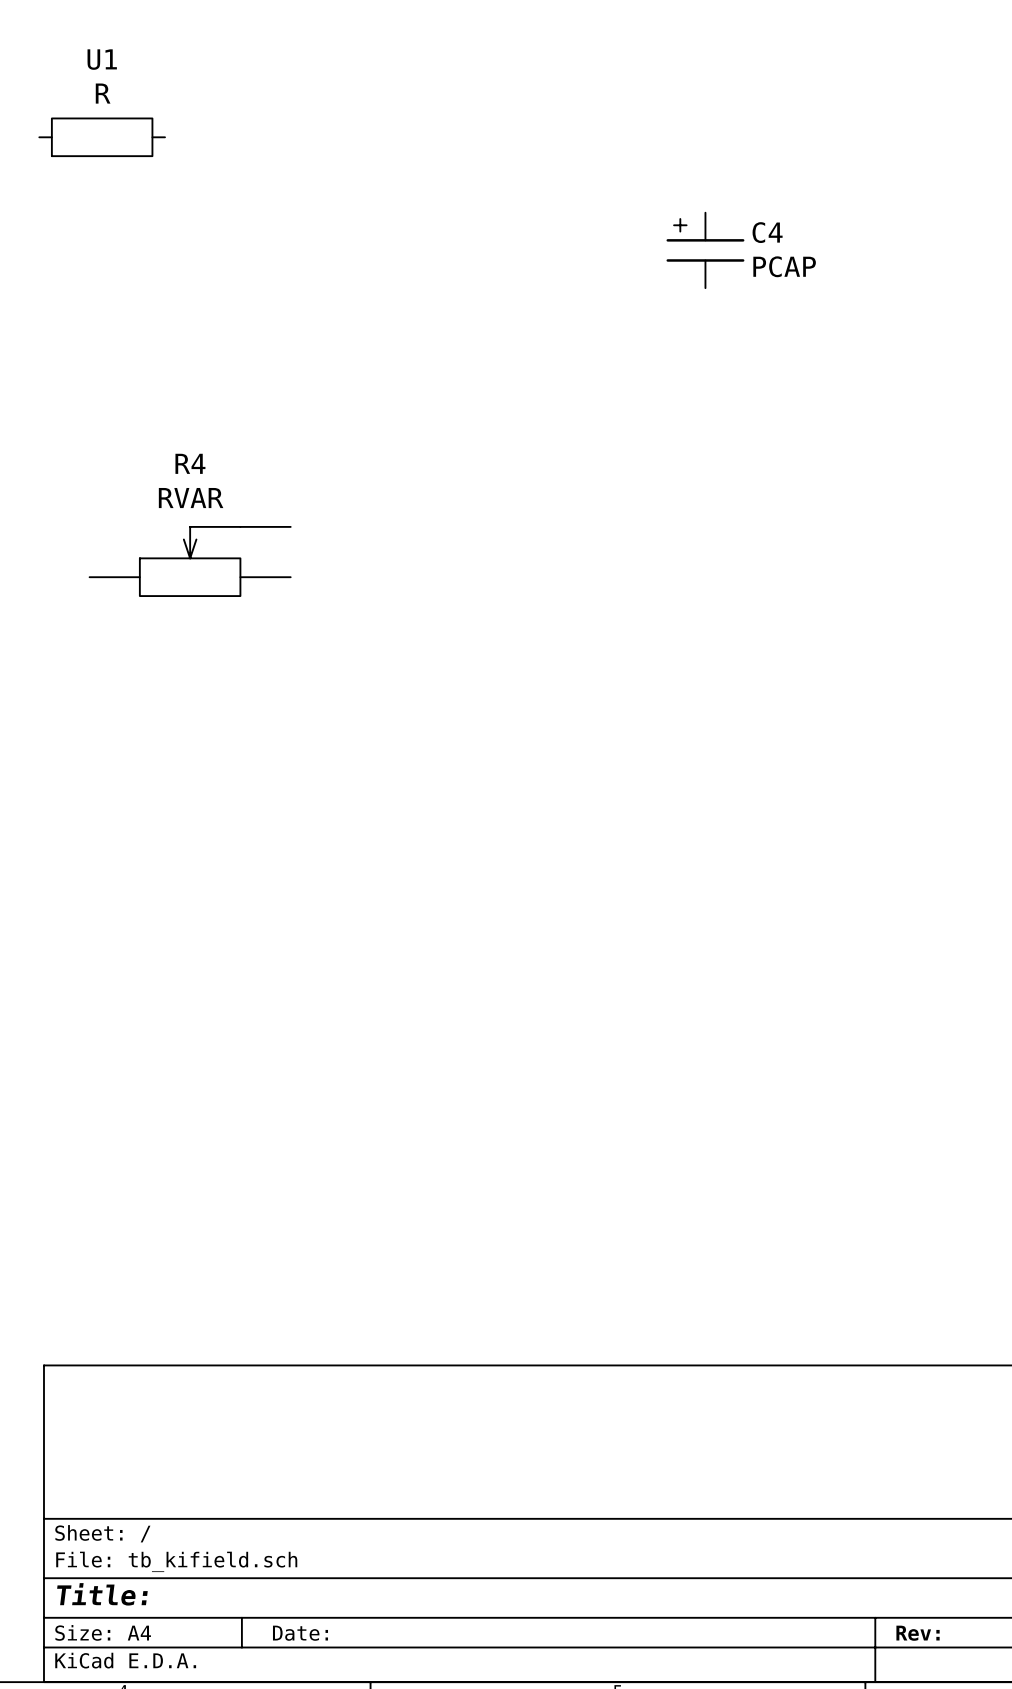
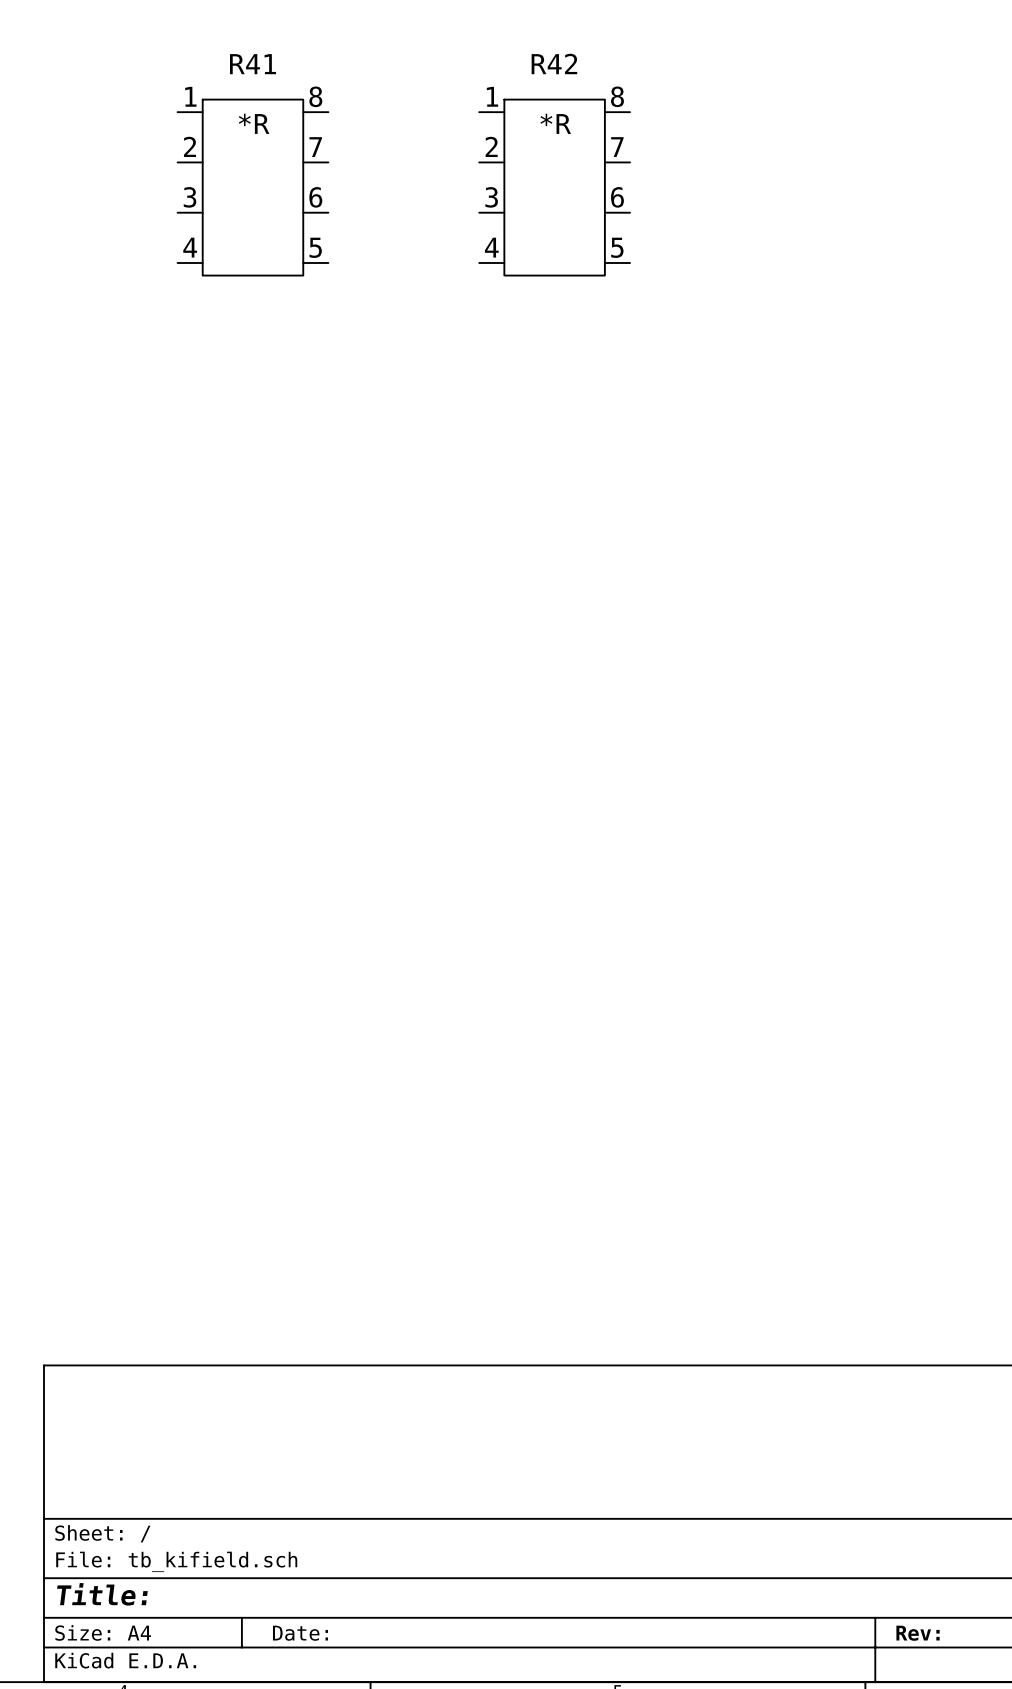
U1: R (102, 137) -> none
R41: none -> (252, 187)
R42: none -> (554, 187)
C4: PCAP (705, 250) -> none
R4: RVAR (190, 561) -> none

